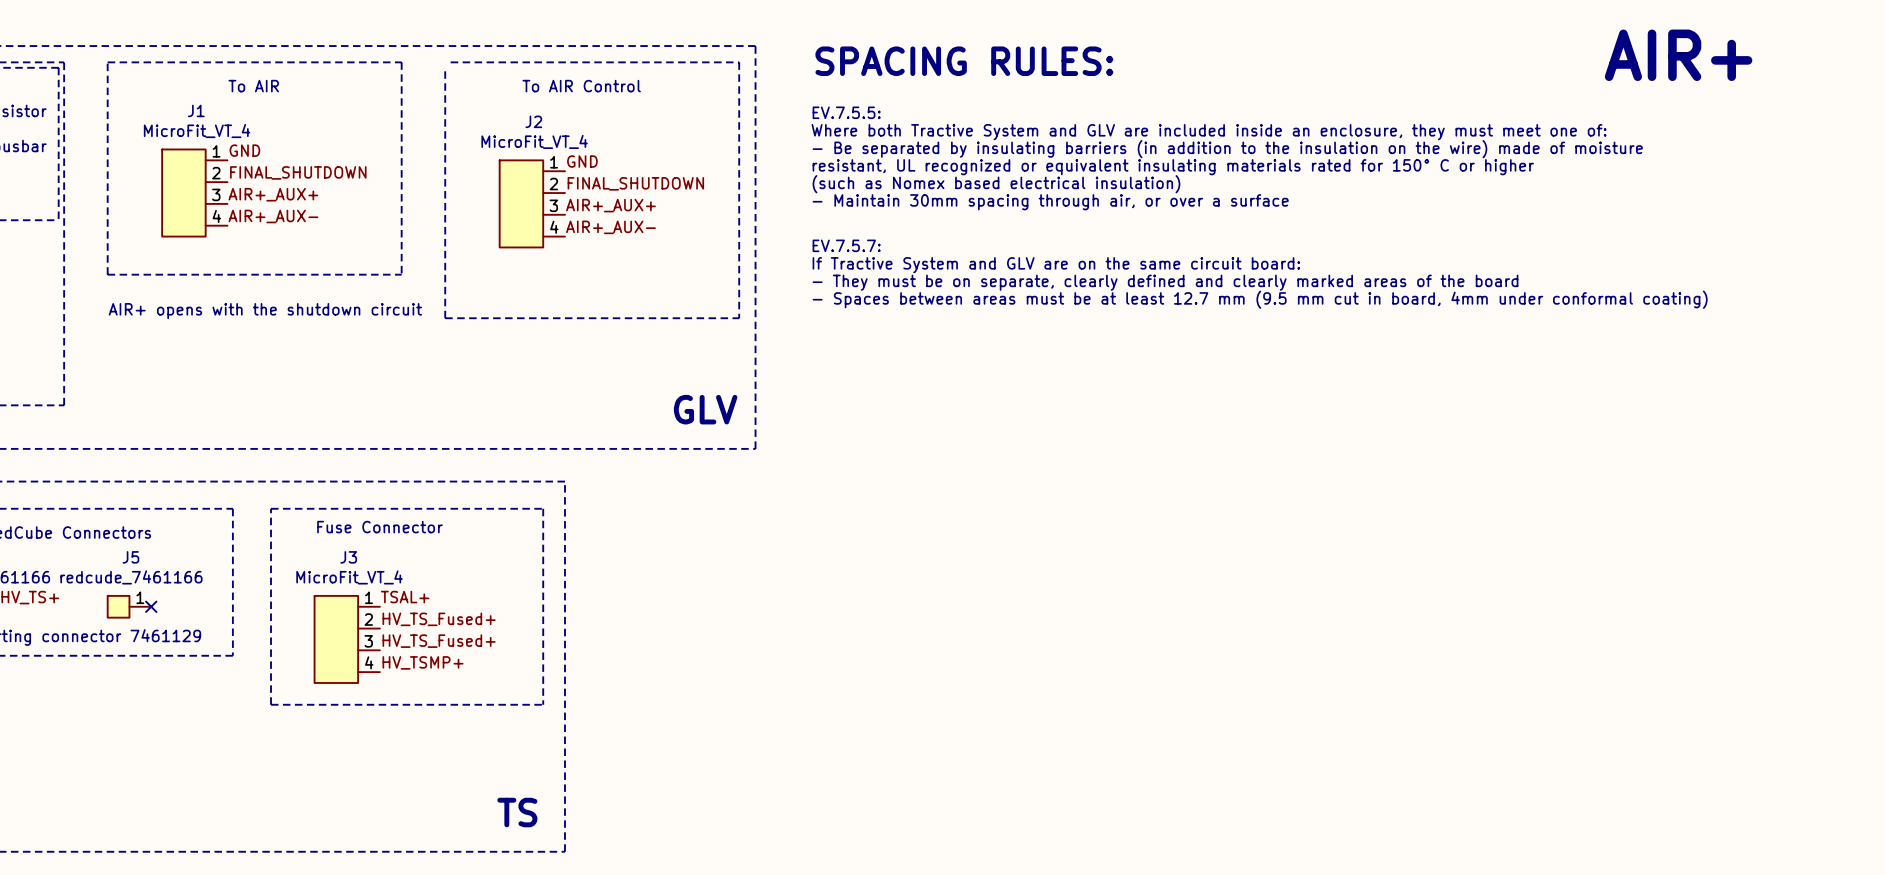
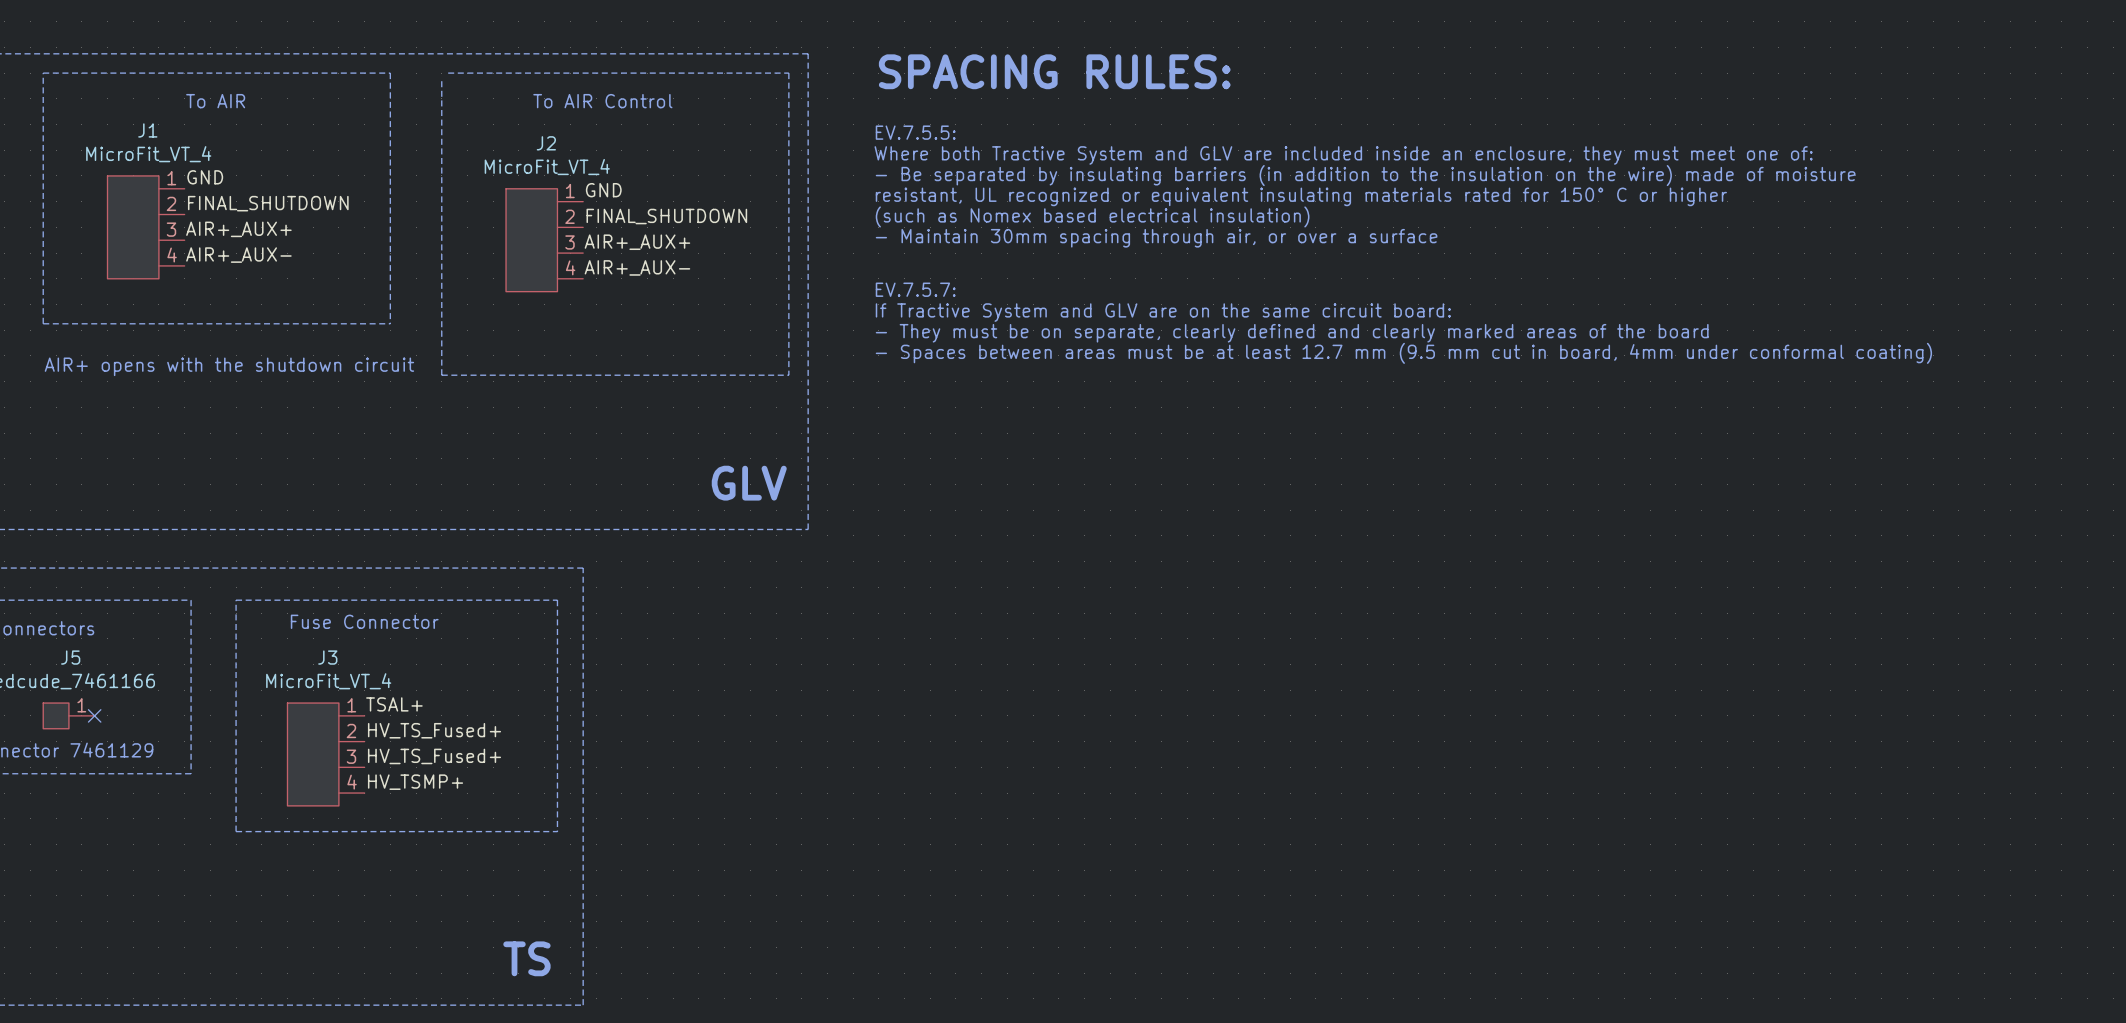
text: AIR+ (1678, 55) -> none

